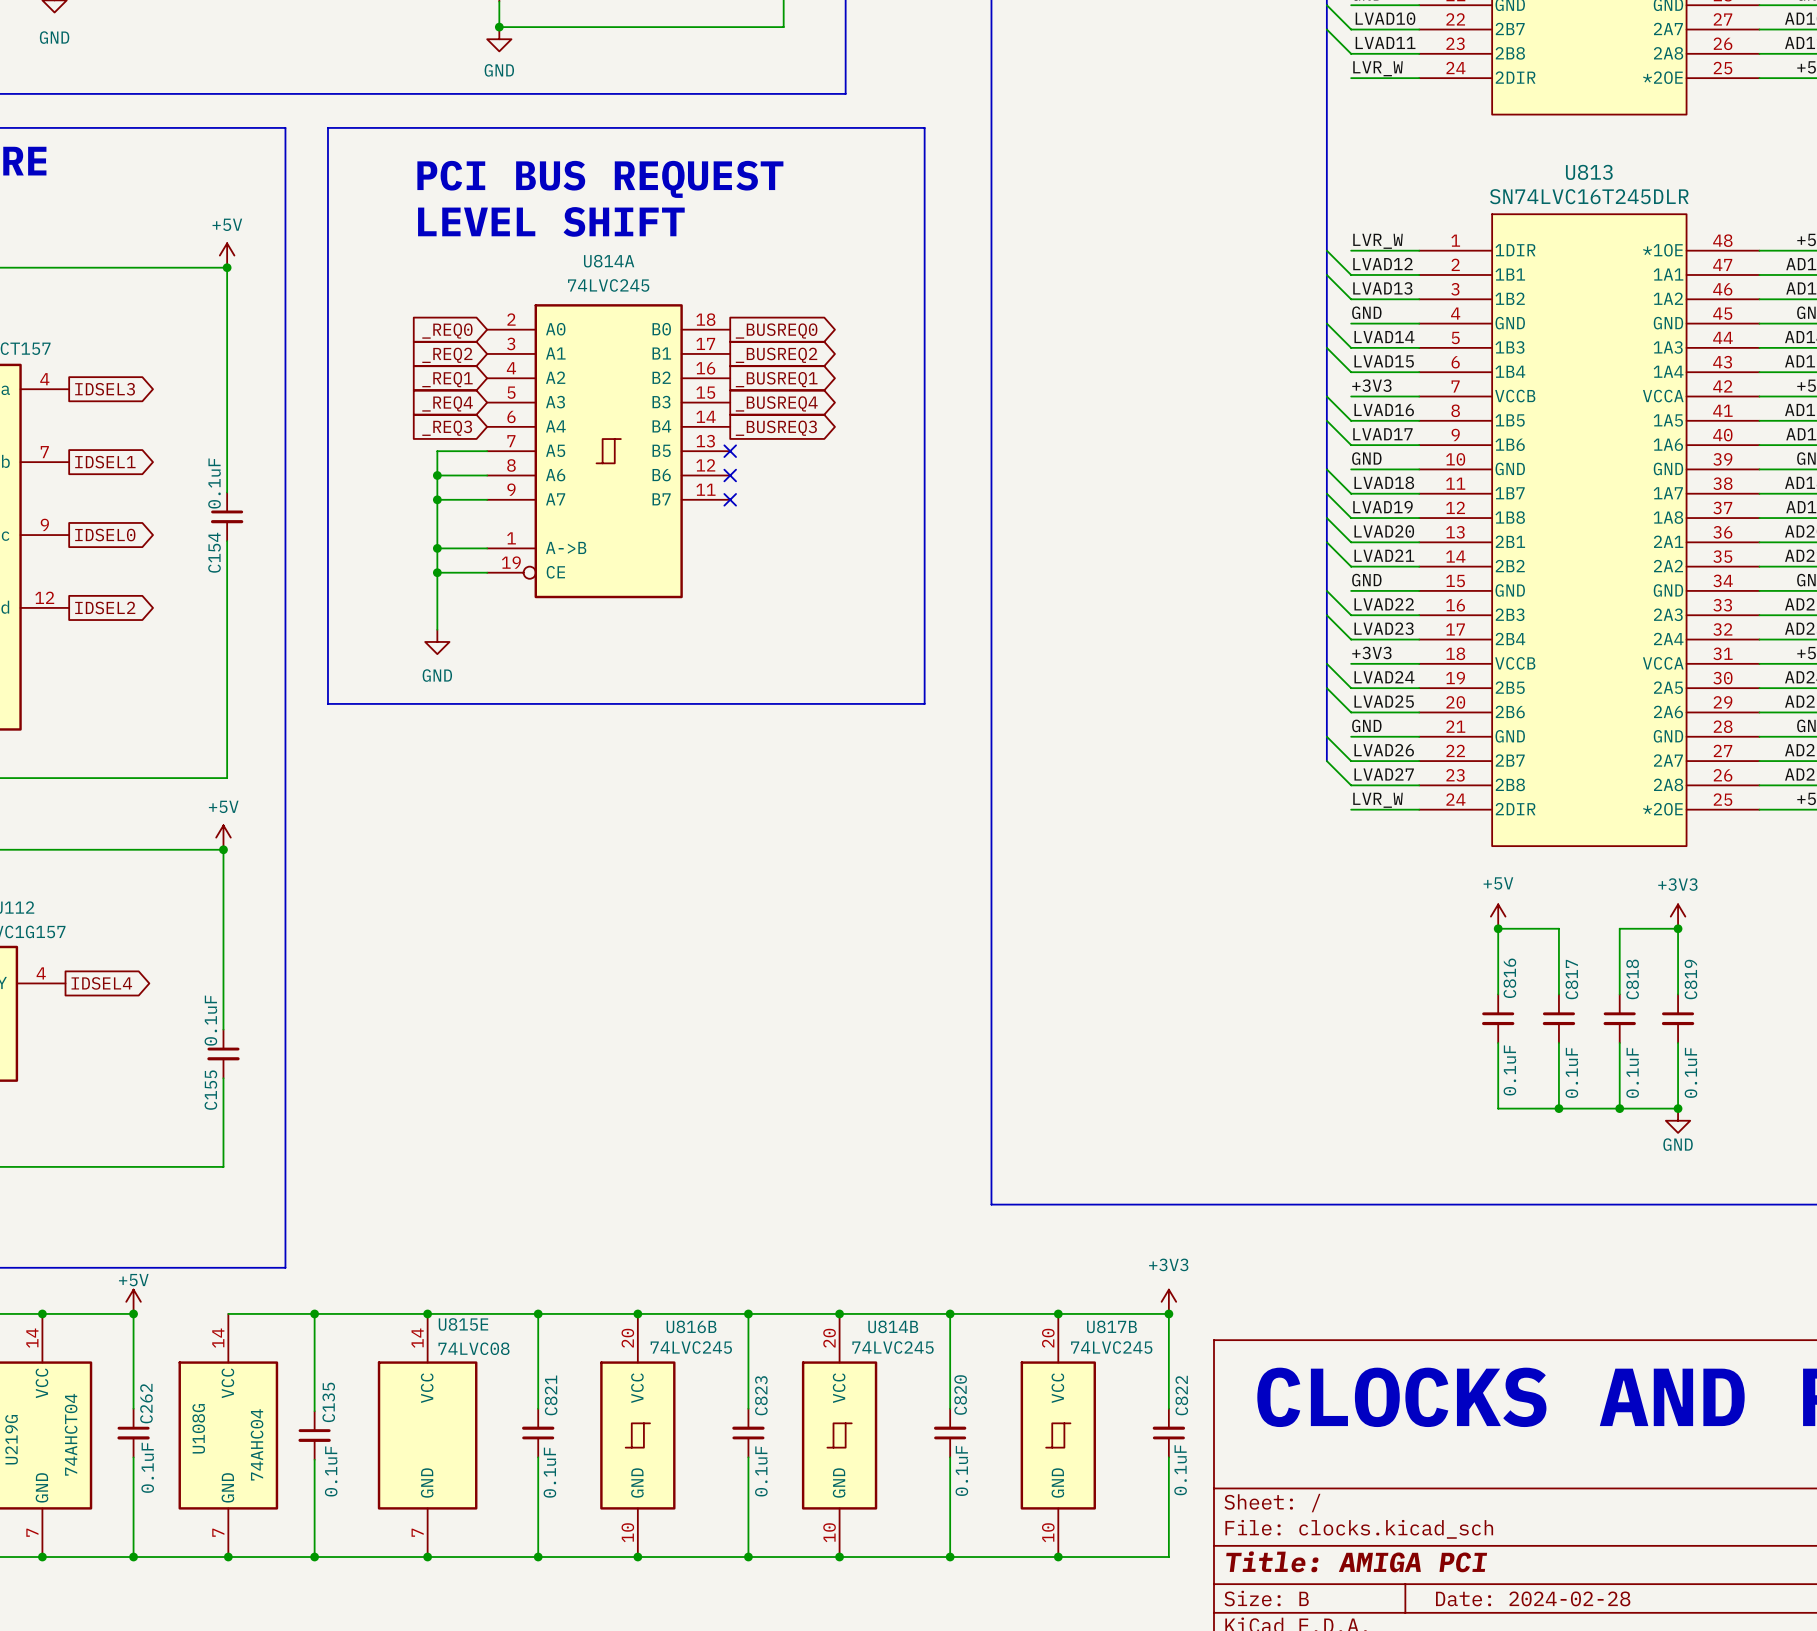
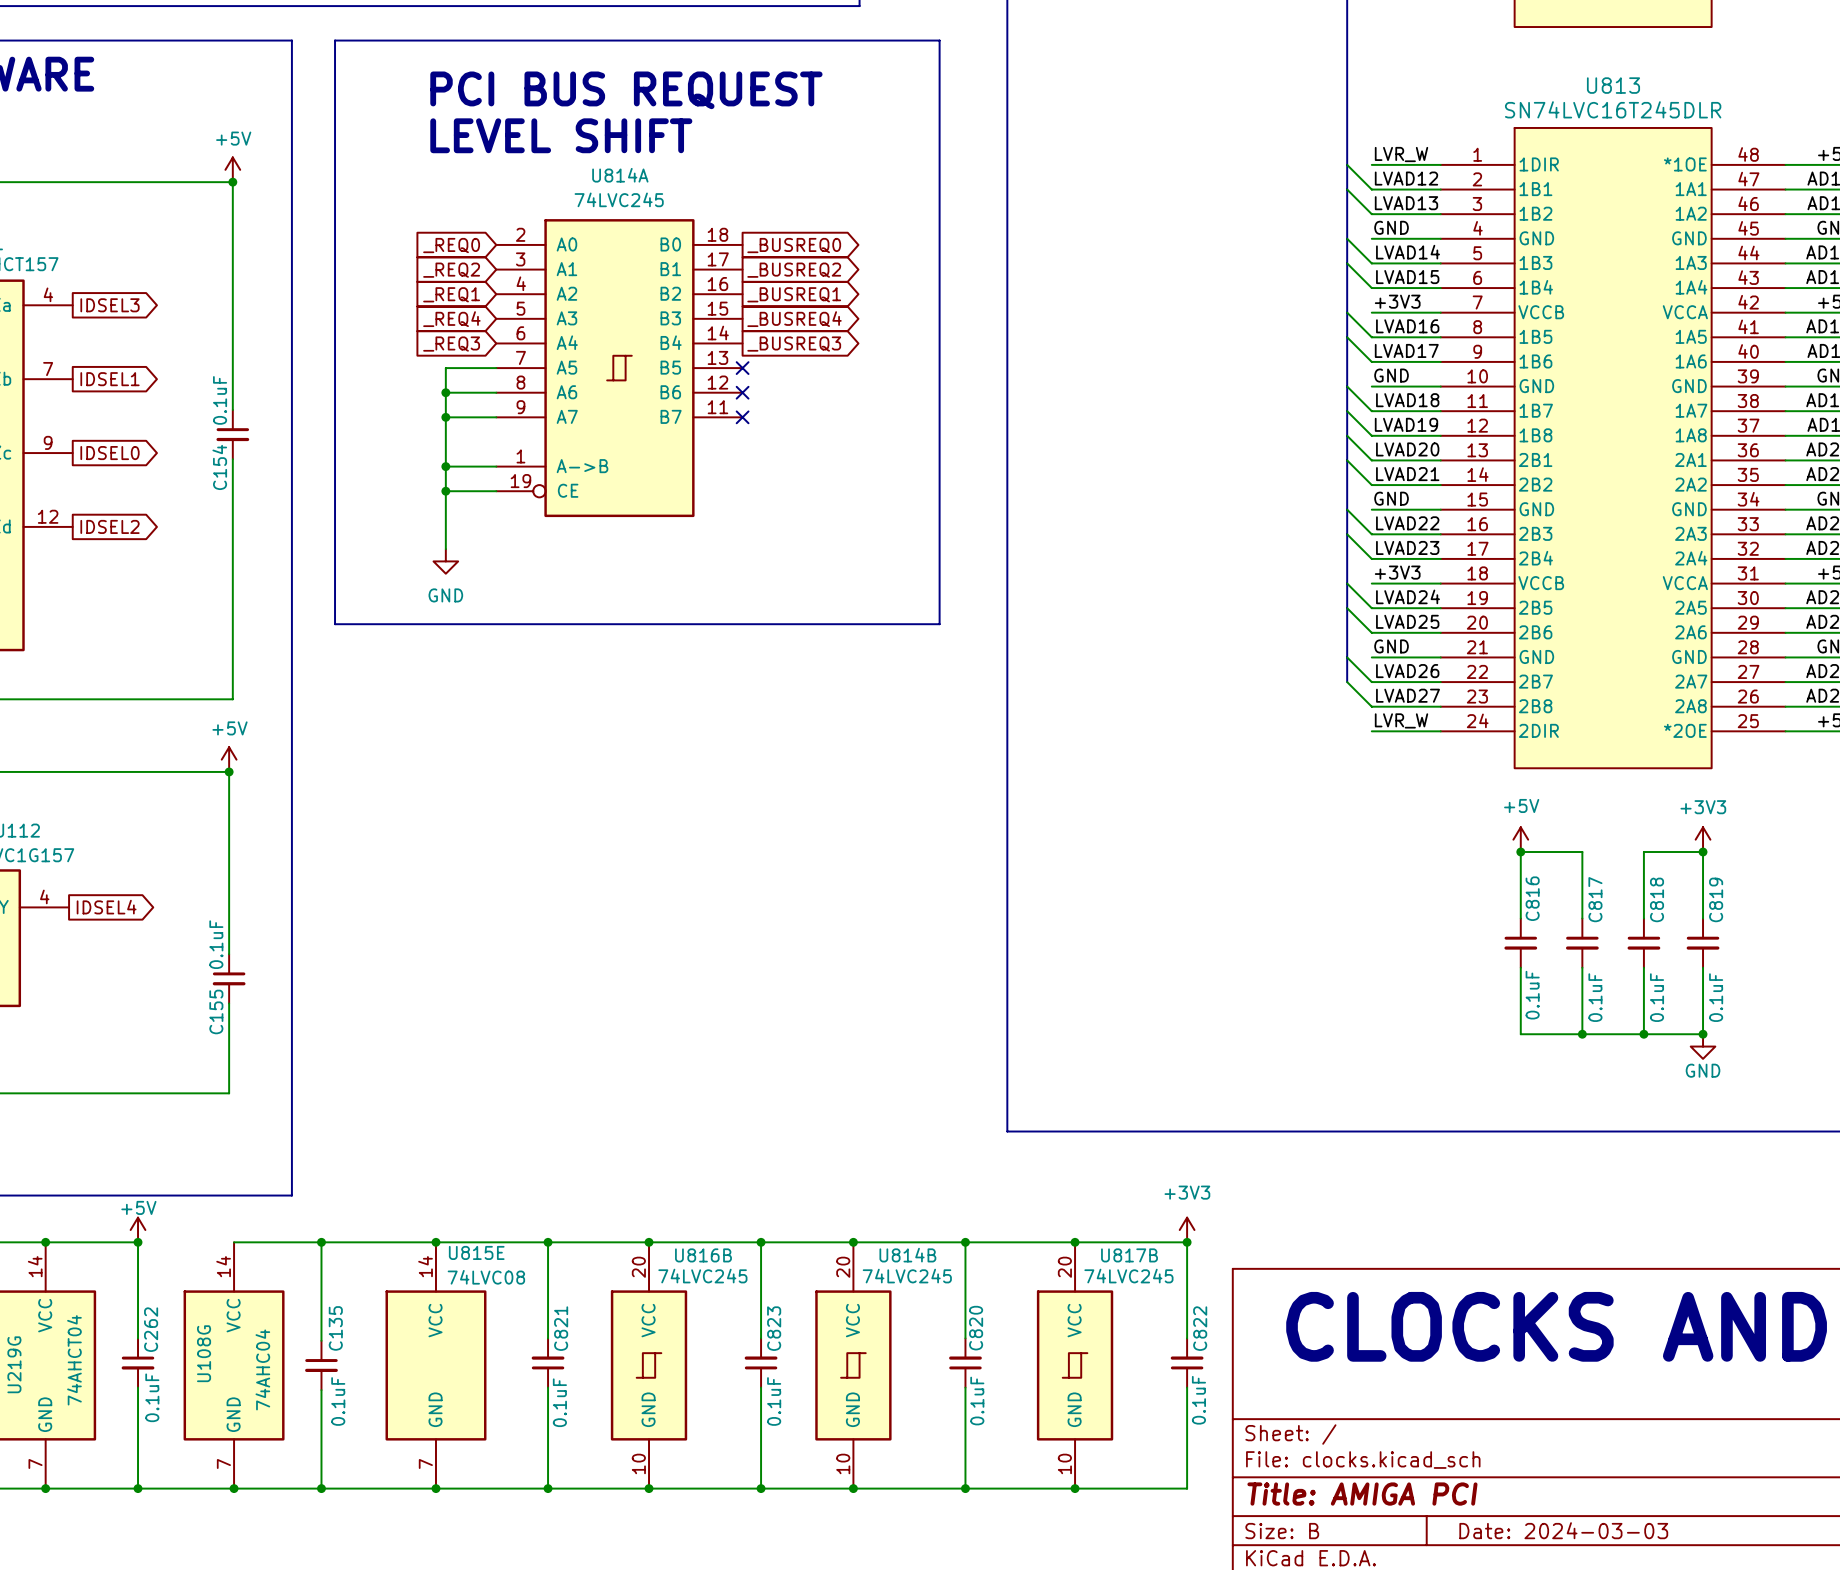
title block: Date: 2024-02-28 (1533, 1598) -> Date: 2024-03-03 (1563, 1530)

